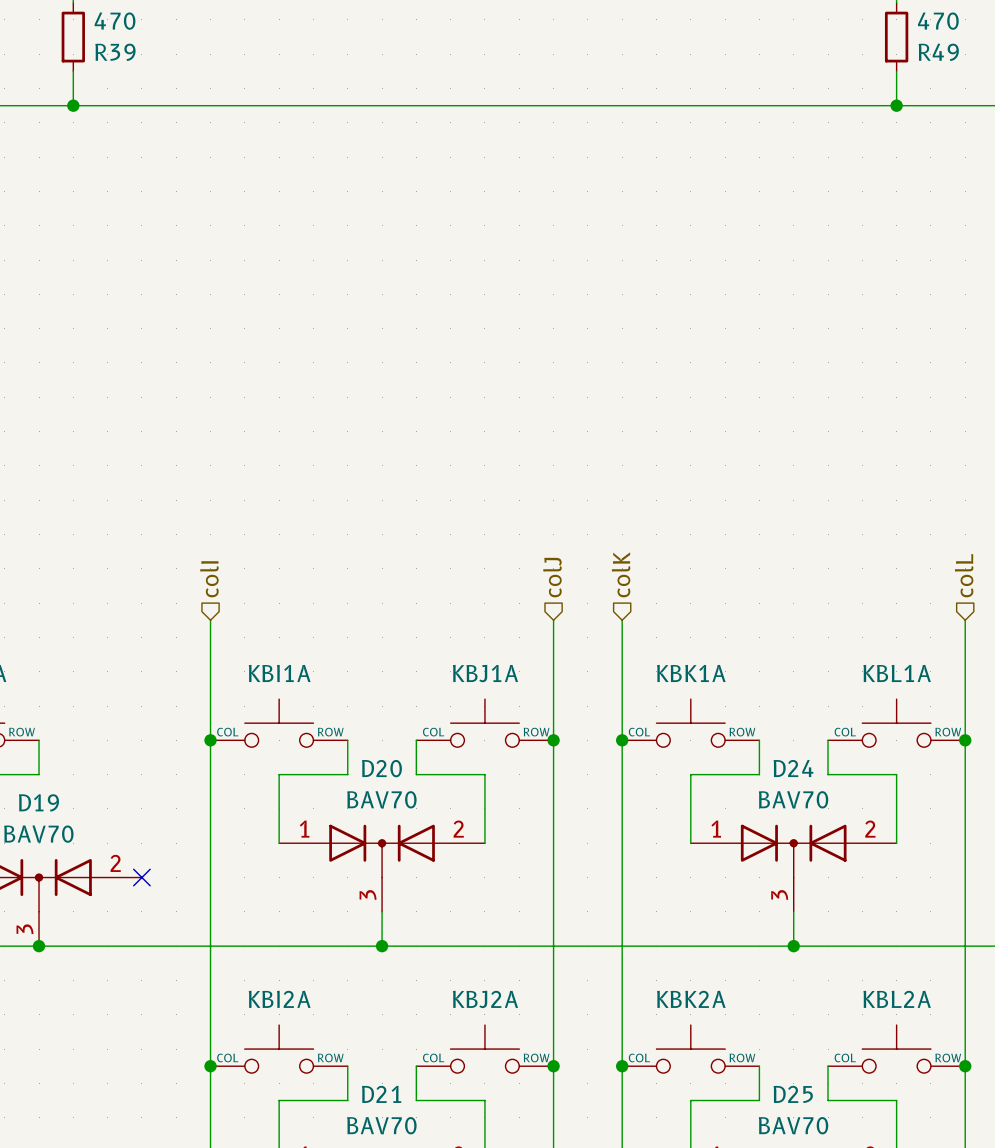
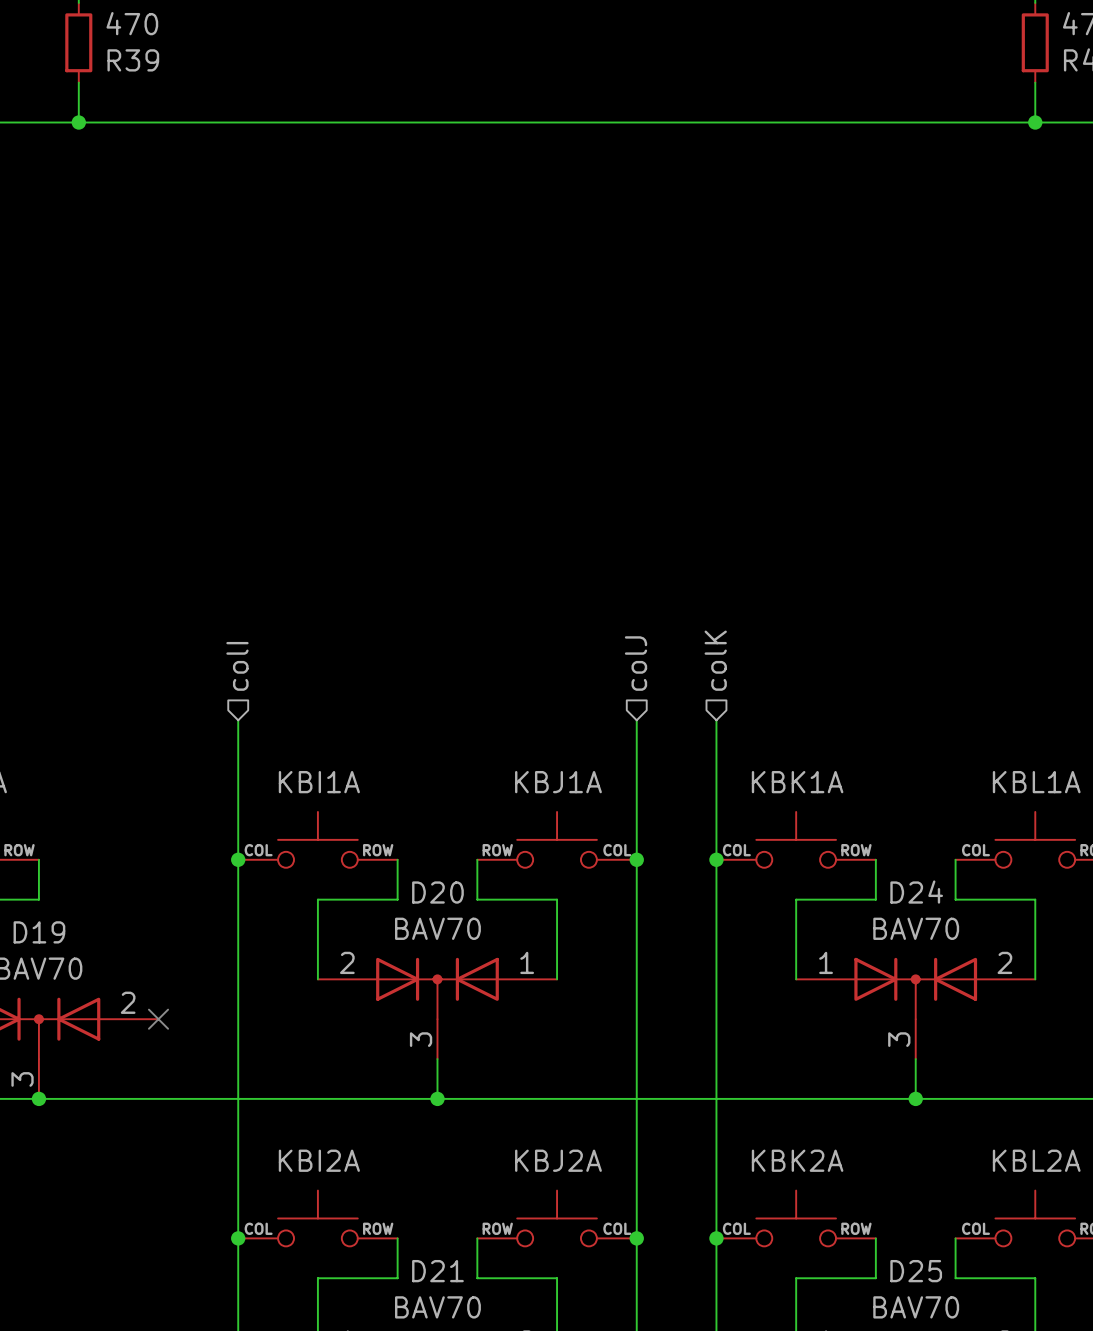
KBJ1A flip: as is (484, 723) -> left-right (557, 839)
D20 flip: as is (382, 851) -> left-right (437, 988)
KBJ2A flip: as is (484, 1049) -> left-right (557, 1218)

